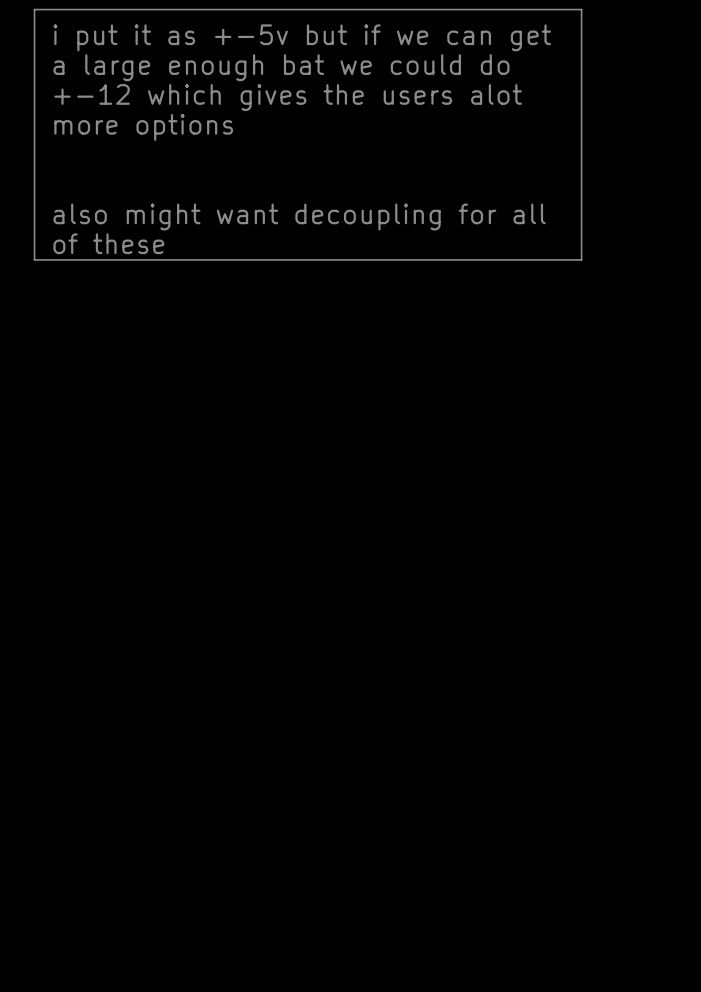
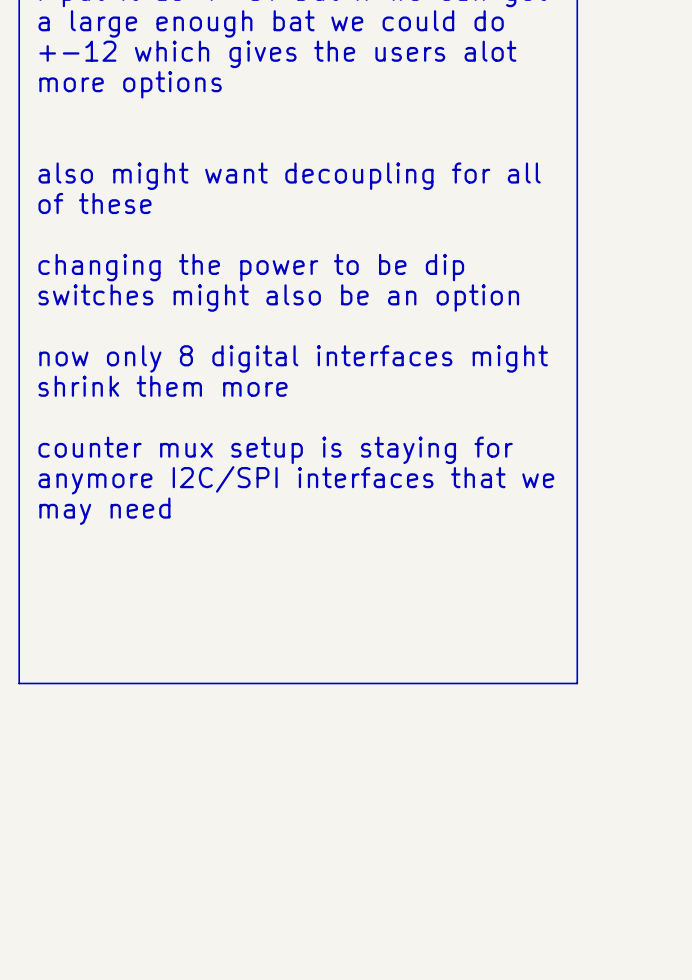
line: (34, 259) (581, 259) -> (19, 219) (19, 683) (577, 683) (577, 219)
text: none -> changing the power to be dip (251, 267)
text: none -> switches might also be an option (278, 298)
text: none -> now only 8 digital interfaces might (293, 358)
text: none -> shrink them more (163, 386)
text: none -> counter mux setup is staying for (275, 450)
text: none -> anymore I2C/SPI interfaces that we (296, 480)
text: none -> may need (104, 511)

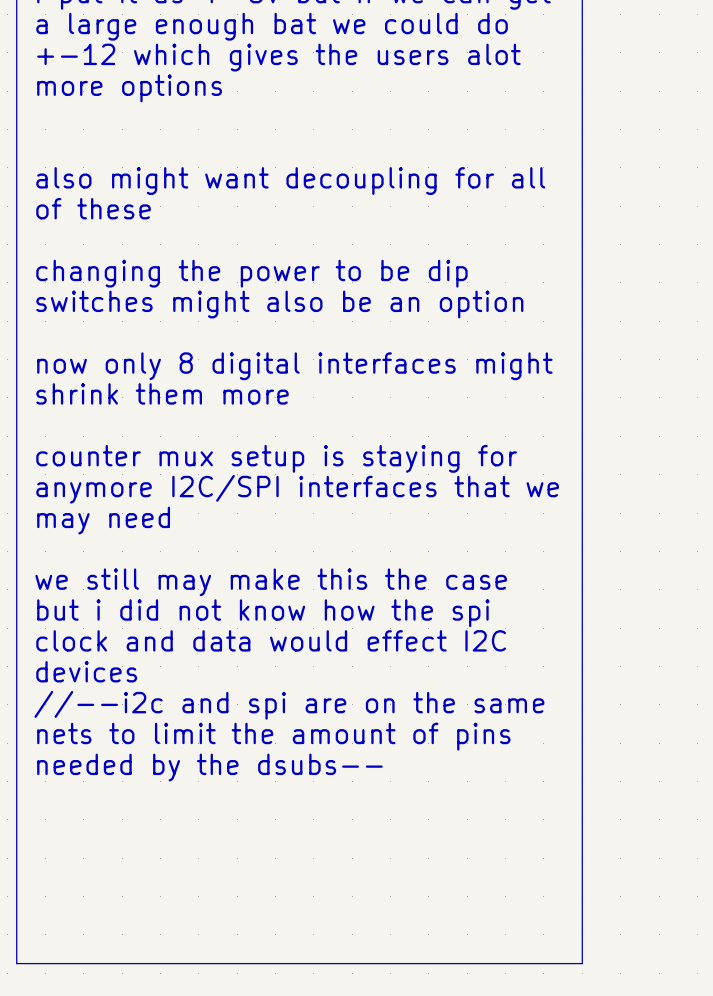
text: none -> we still may make this the case (271, 582)
text: none -> but i did not know how the spi (263, 613)
text: none -> clock and data would effect I2C (271, 640)
text: none -> devices (86, 671)
line: (19, 683) (577, 683) -> (16, 695) (16, 963) (582, 963) (582, 695)
text: none -> //--i2c and spi are on the same (289, 705)
text: none -> nets to limit the amount of pins (273, 736)
text: none -> needed by the dsubs-- (209, 767)

